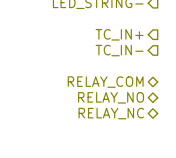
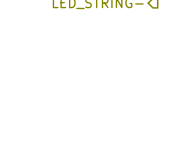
hierarchical label: TC_IN+ (119, 34) -> none
hierarchical label: TC_IN- (119, 50) -> none
hierarchical label: RELAY_COM (105, 82) -> none
hierarchical label: RELAY_NO (111, 97) -> none
hierarchical label: RELAY_NC (111, 113) -> none

